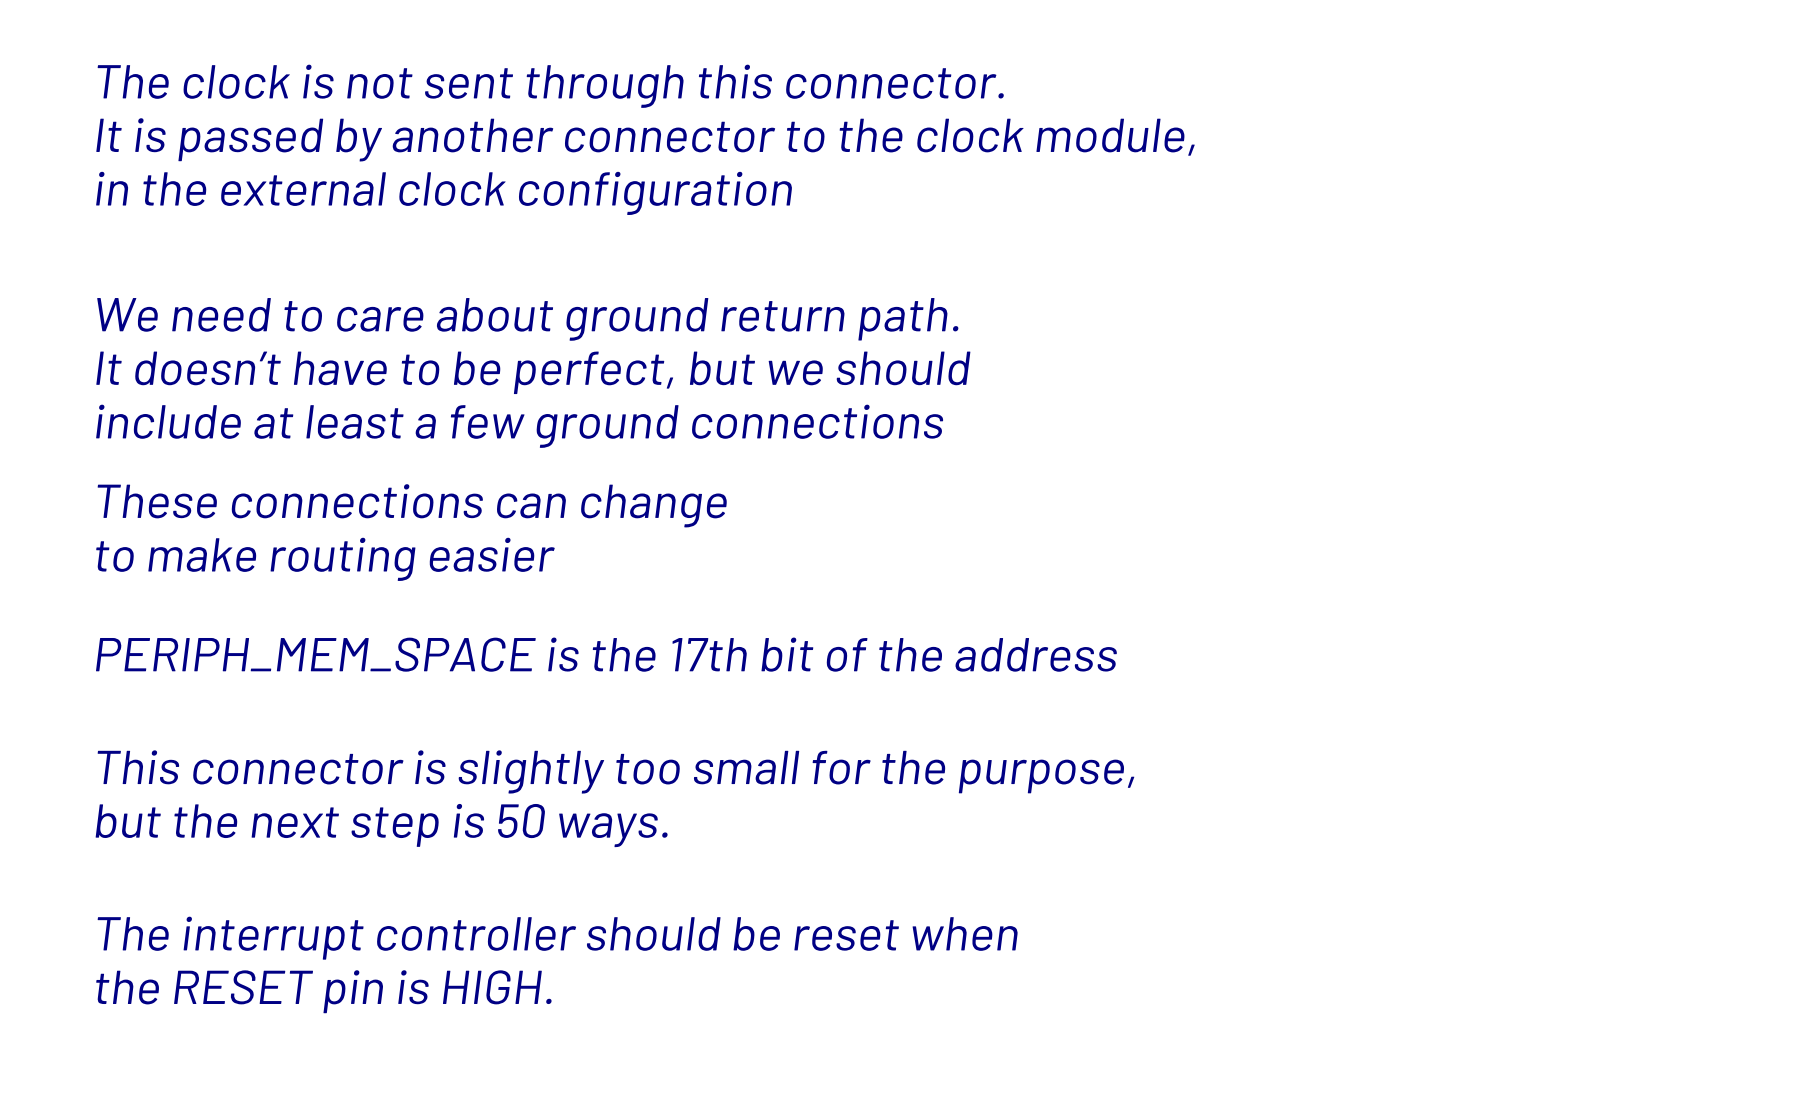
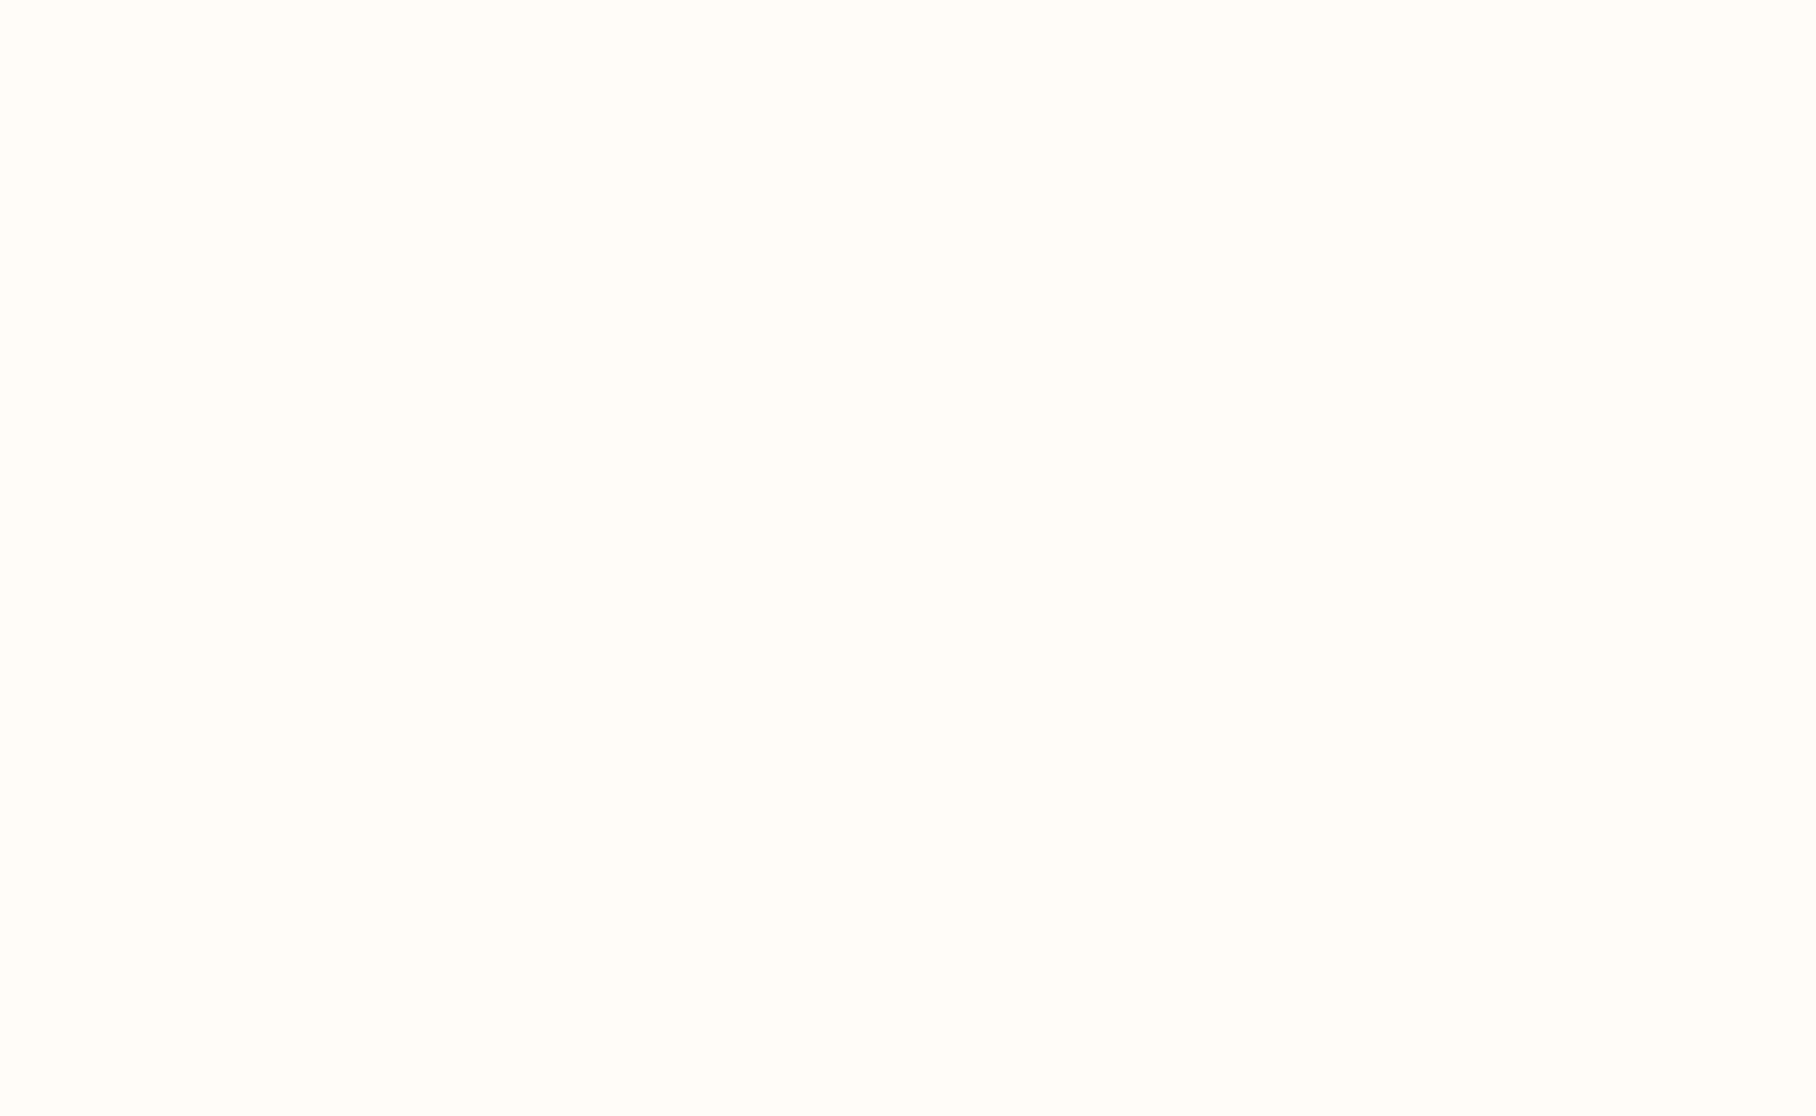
text: The clock is not sent through this connector. (550, 86) -> none
text: It is passed by another connector to the clock module, (645, 139) -> none
text: in the external clock configuration (444, 193) -> none
text: We need to care about ground return path. (527, 319) -> none
text: It doesn’t have to be perfect, but we should (533, 372) -> none
text: include at least a few ground connections (519, 426) -> none
text: These connections can change (412, 505) -> none
text: to make routing easier (325, 559) -> none
text: PERIPH_MEM_SPACE is the 17th bit of the address (606, 654) -> none
text: This connector is slightly too small for the purpose, (615, 771) -> none
text: but the next step is 50 ways. (381, 825) -> none
text: The interrupt controller should be reset when (557, 938) -> none
text: the RESET pin is HIGH. (323, 991) -> none

